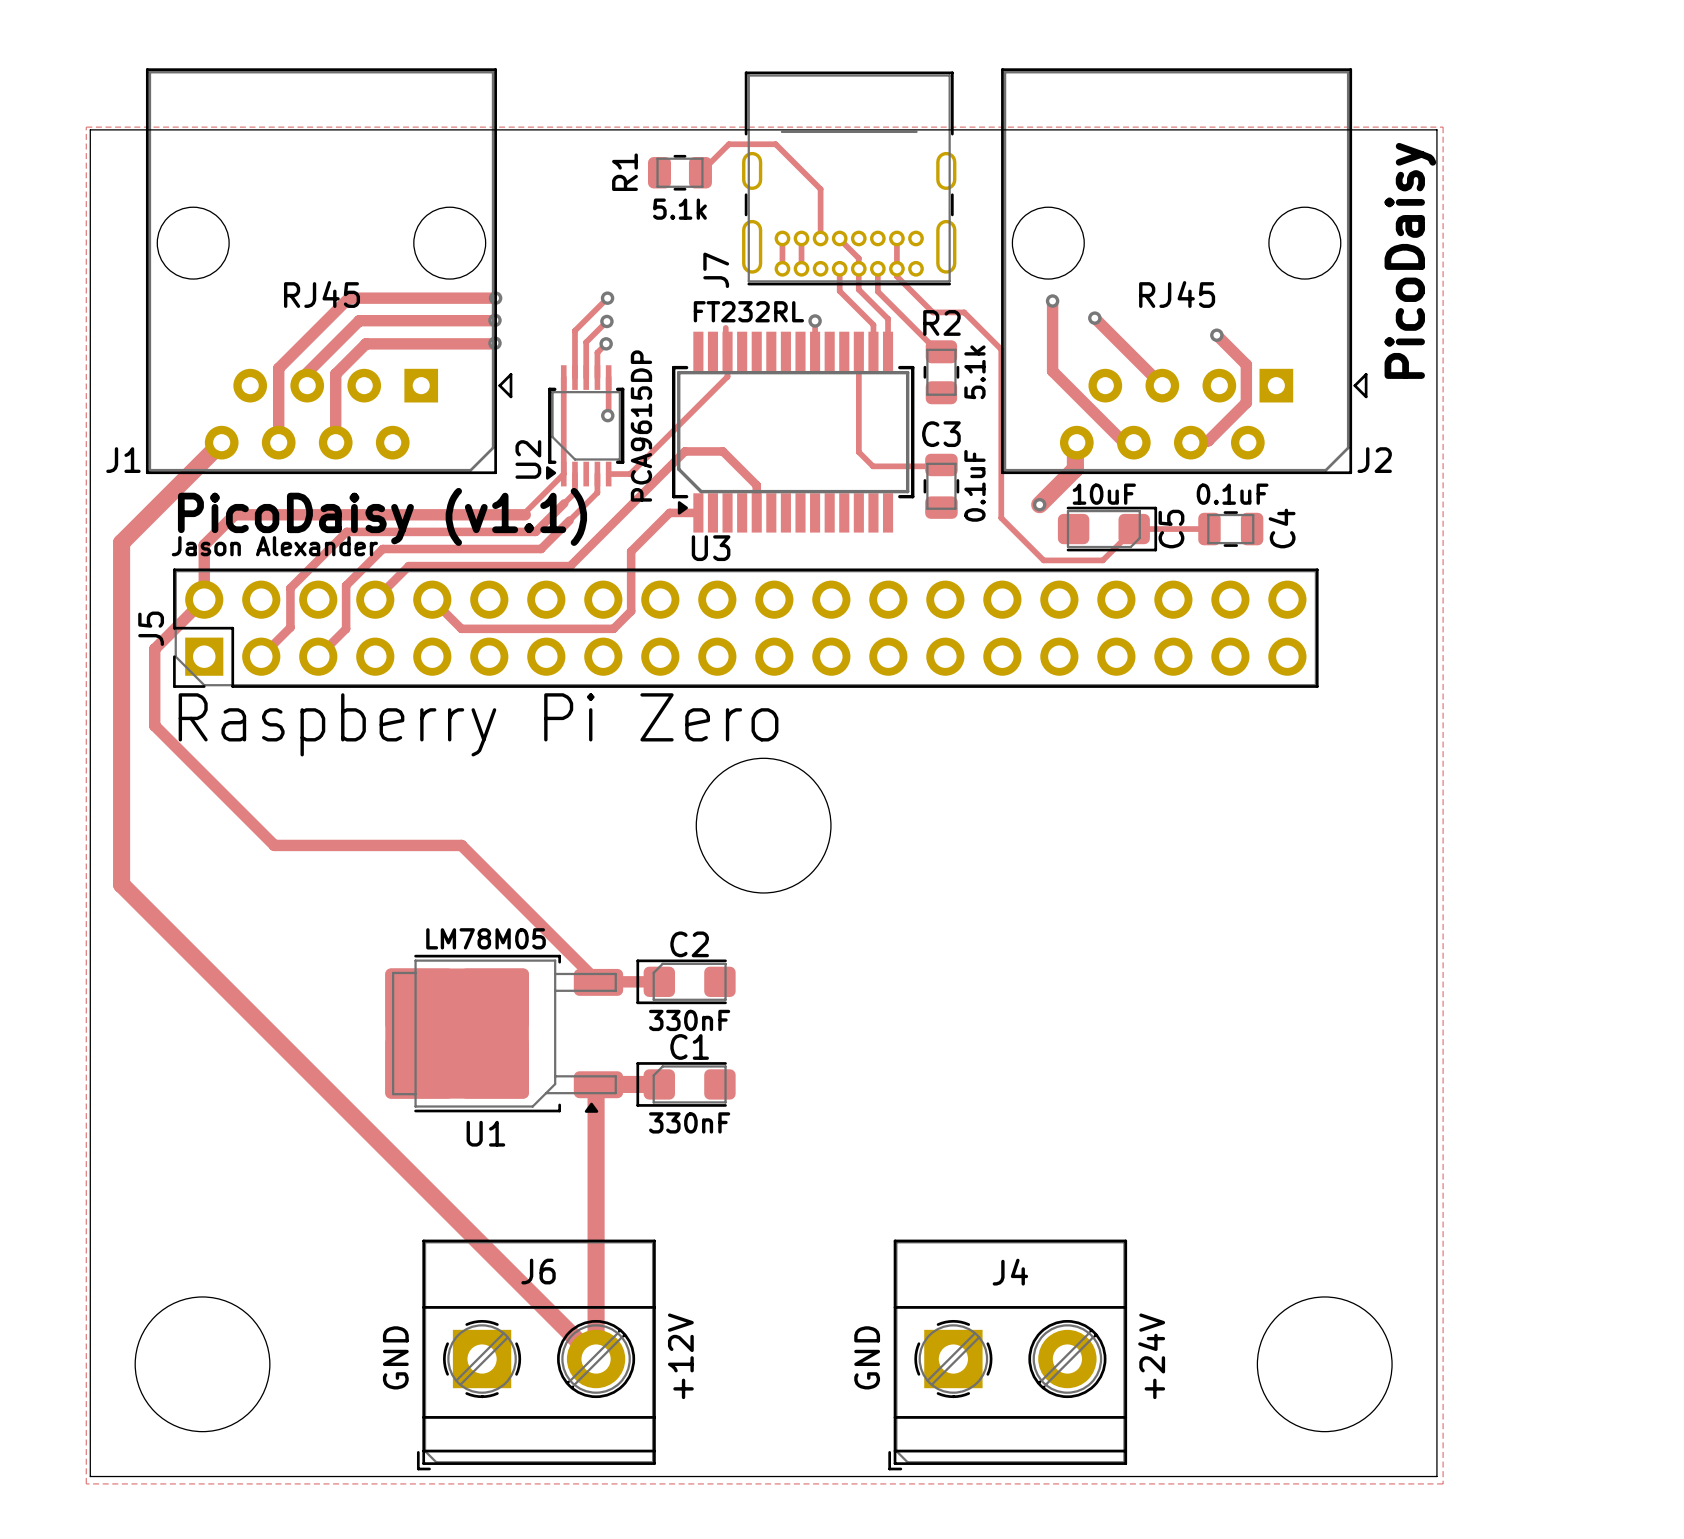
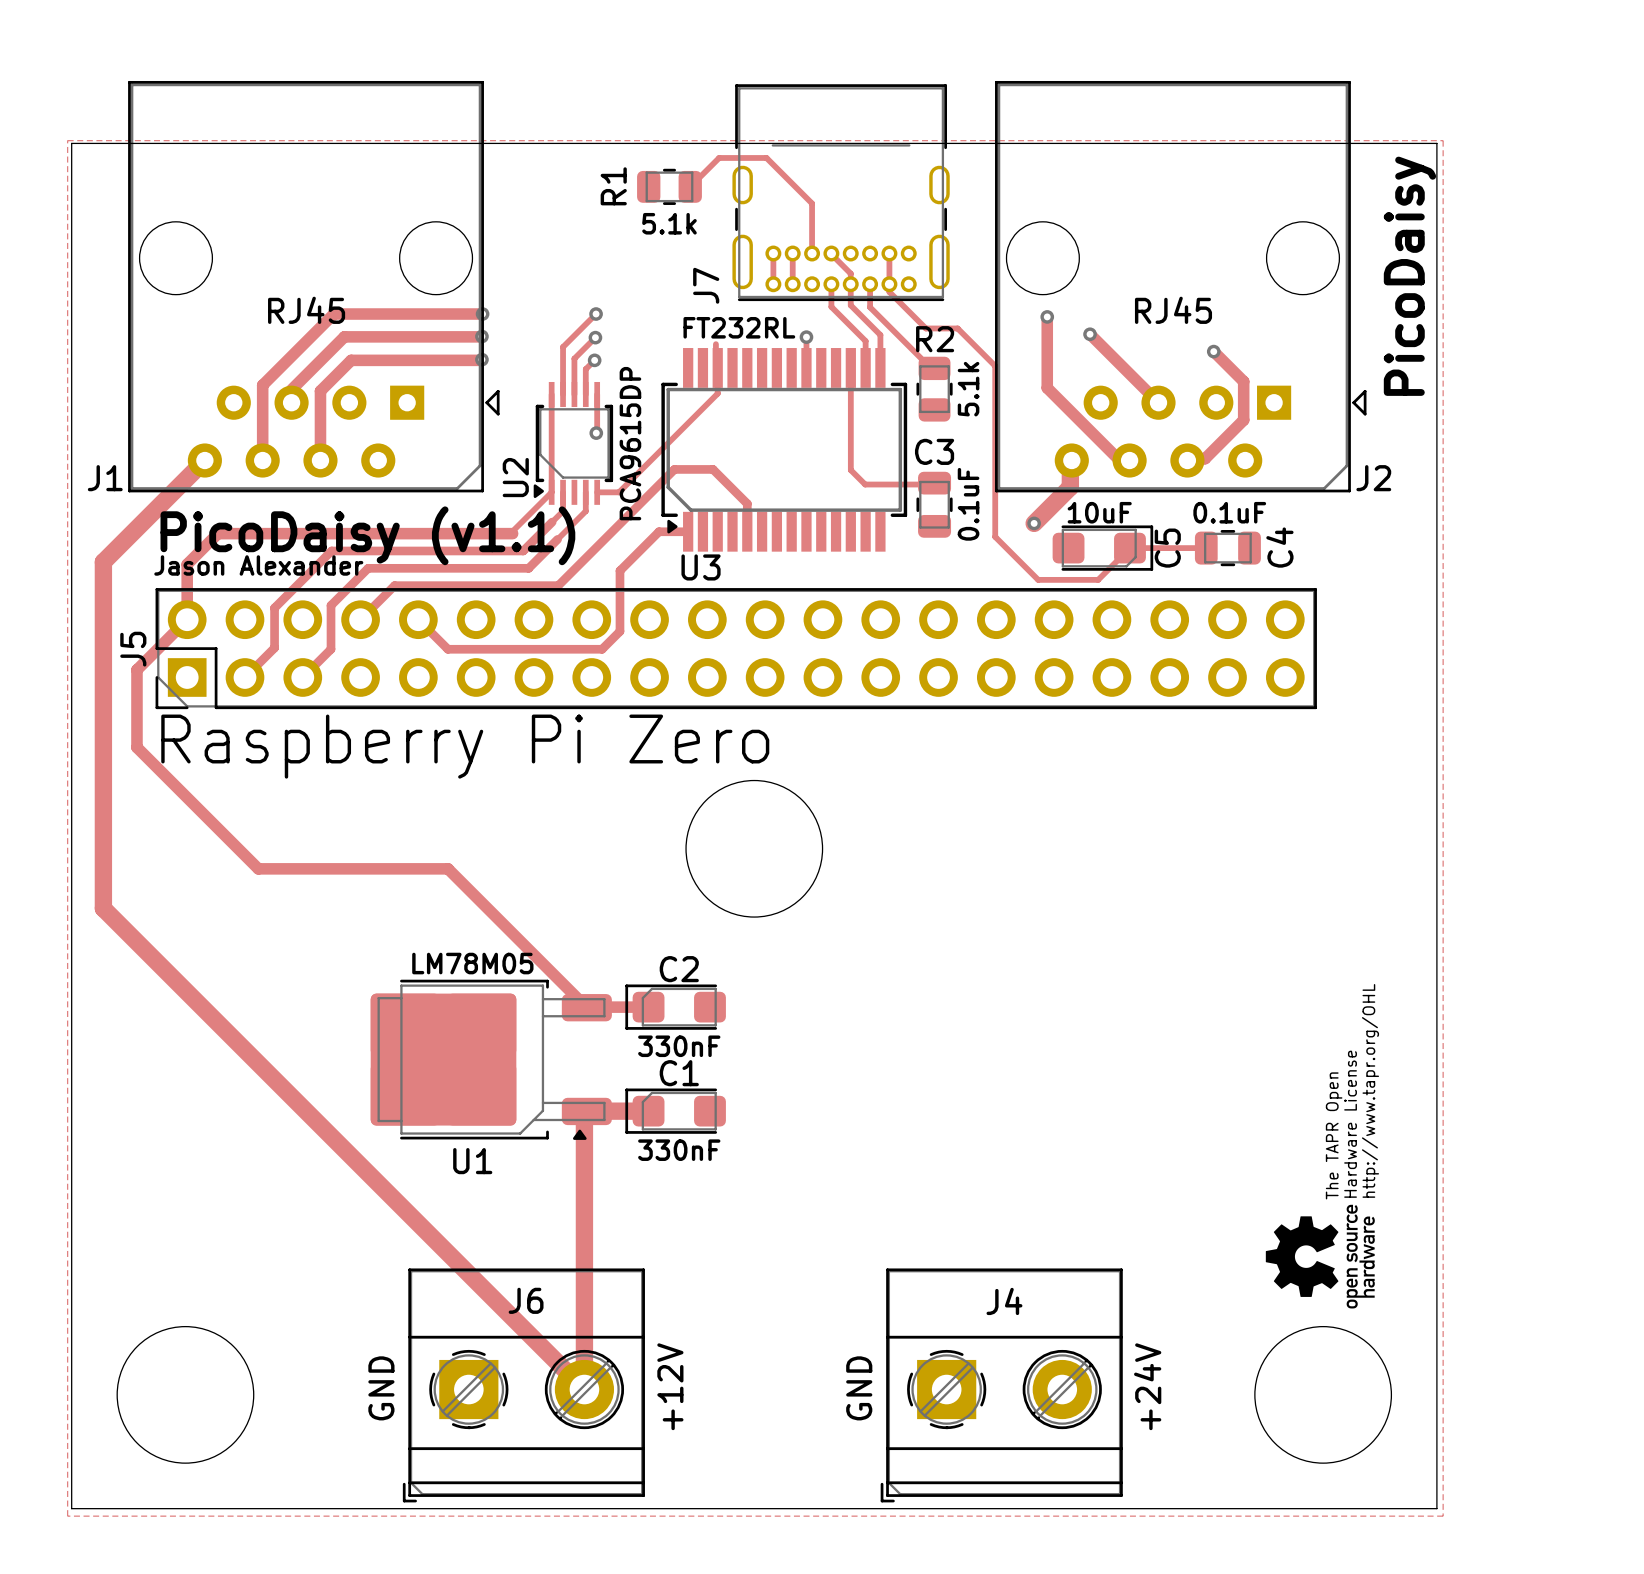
text: none -> http://www.tapr.org/OHL (1370, 1090)
text: none -> Hardware License (1350, 1124)
text: none -> The TAPR Open (1334, 1135)
drawing: none -> [1265, 1204, 1375, 1309]

